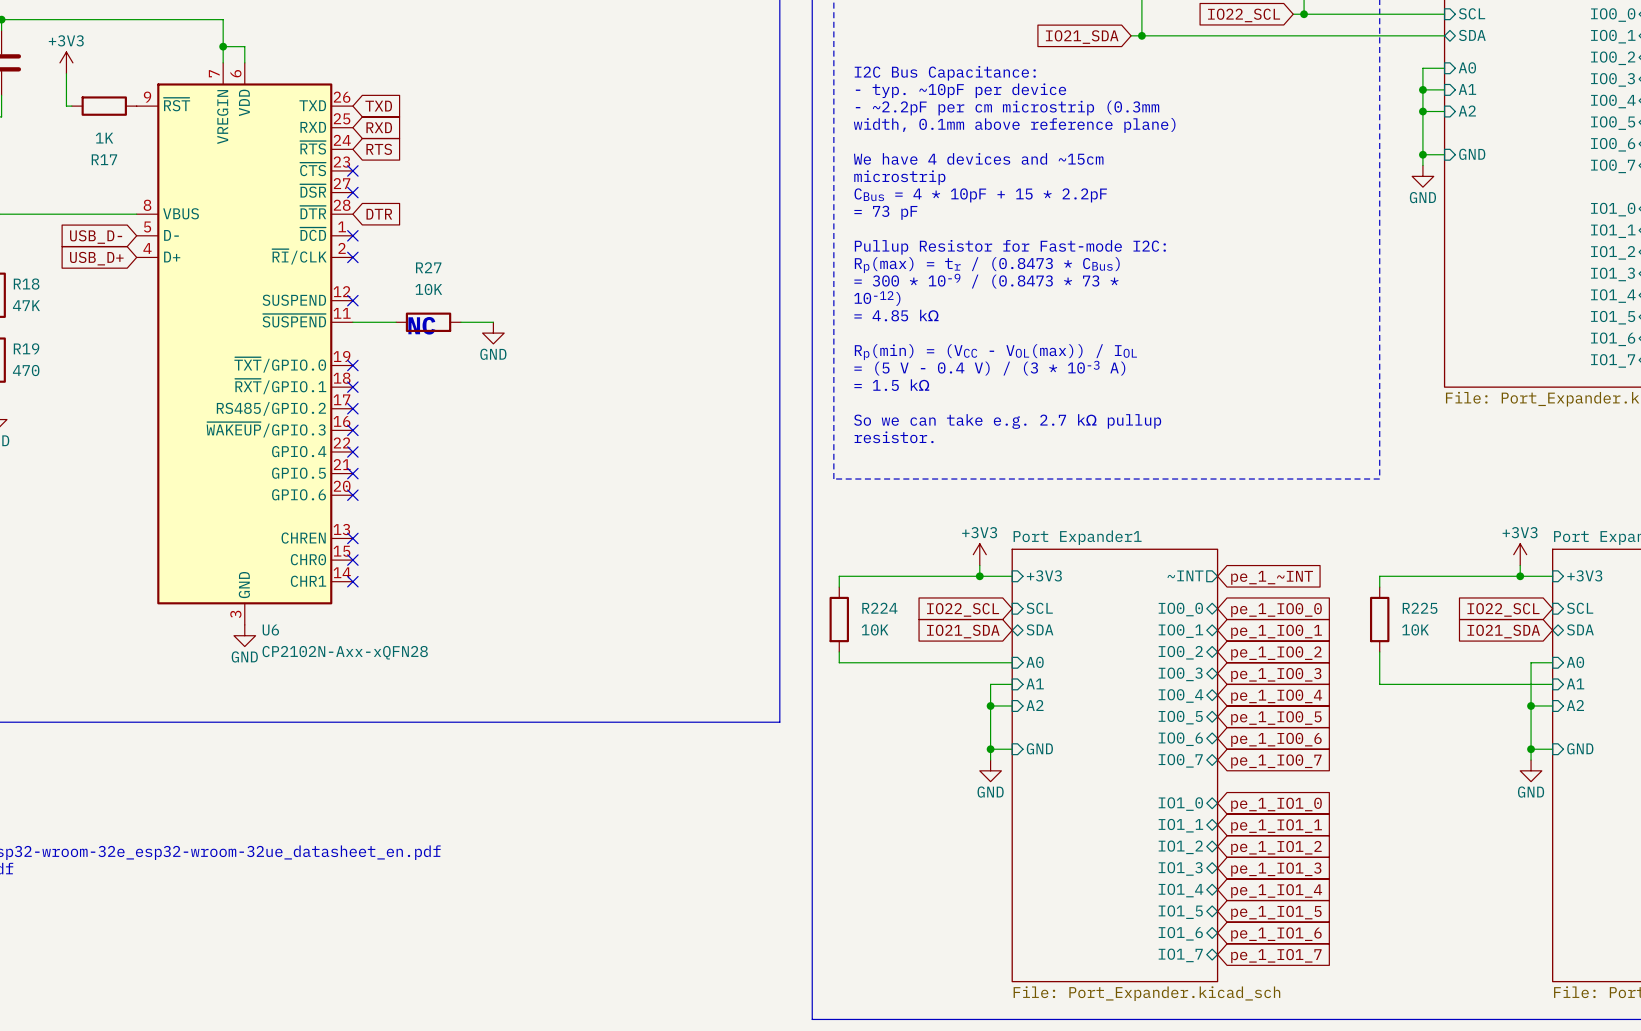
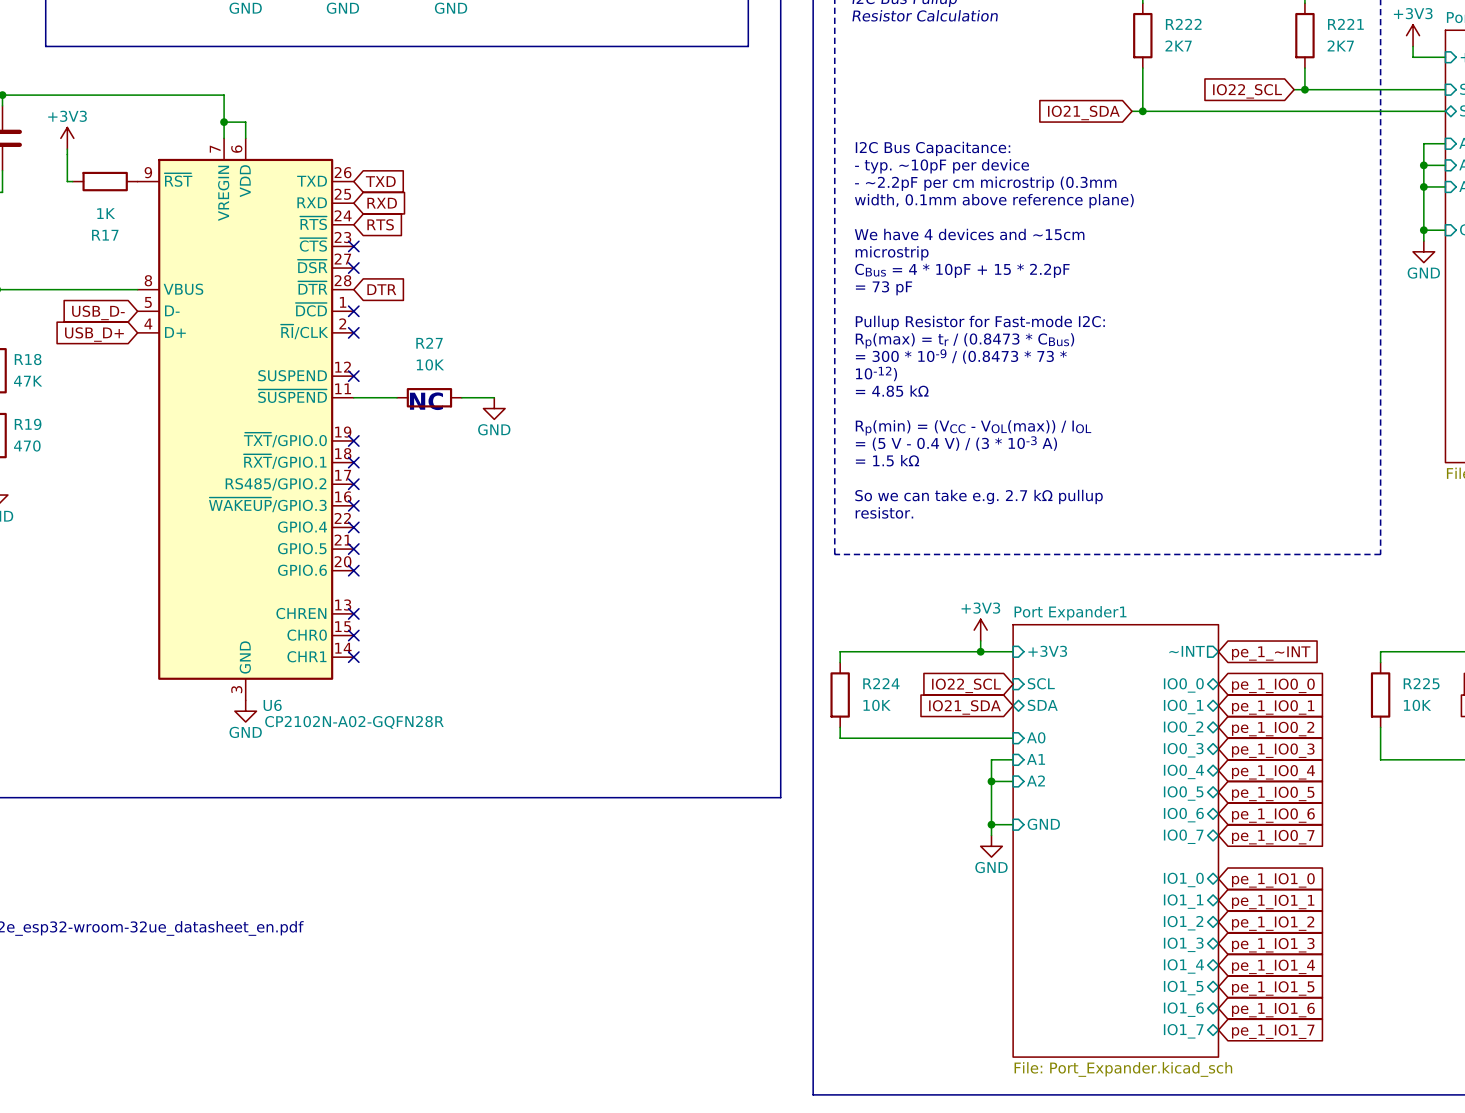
U6 value: CP2102N-Axx-xQFN28 (345, 652) -> CP2102N-A02-GQFN28R (354, 722)

